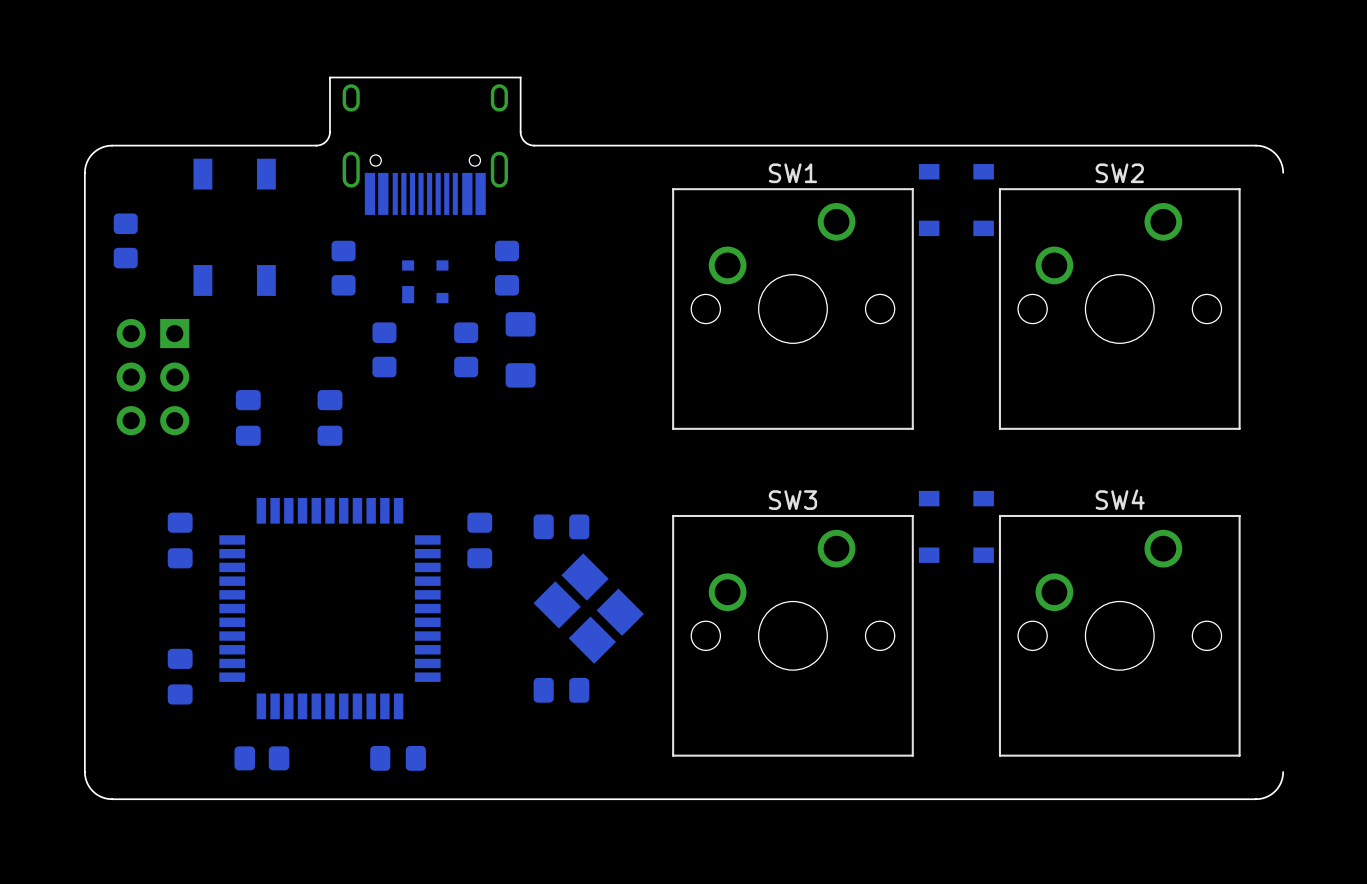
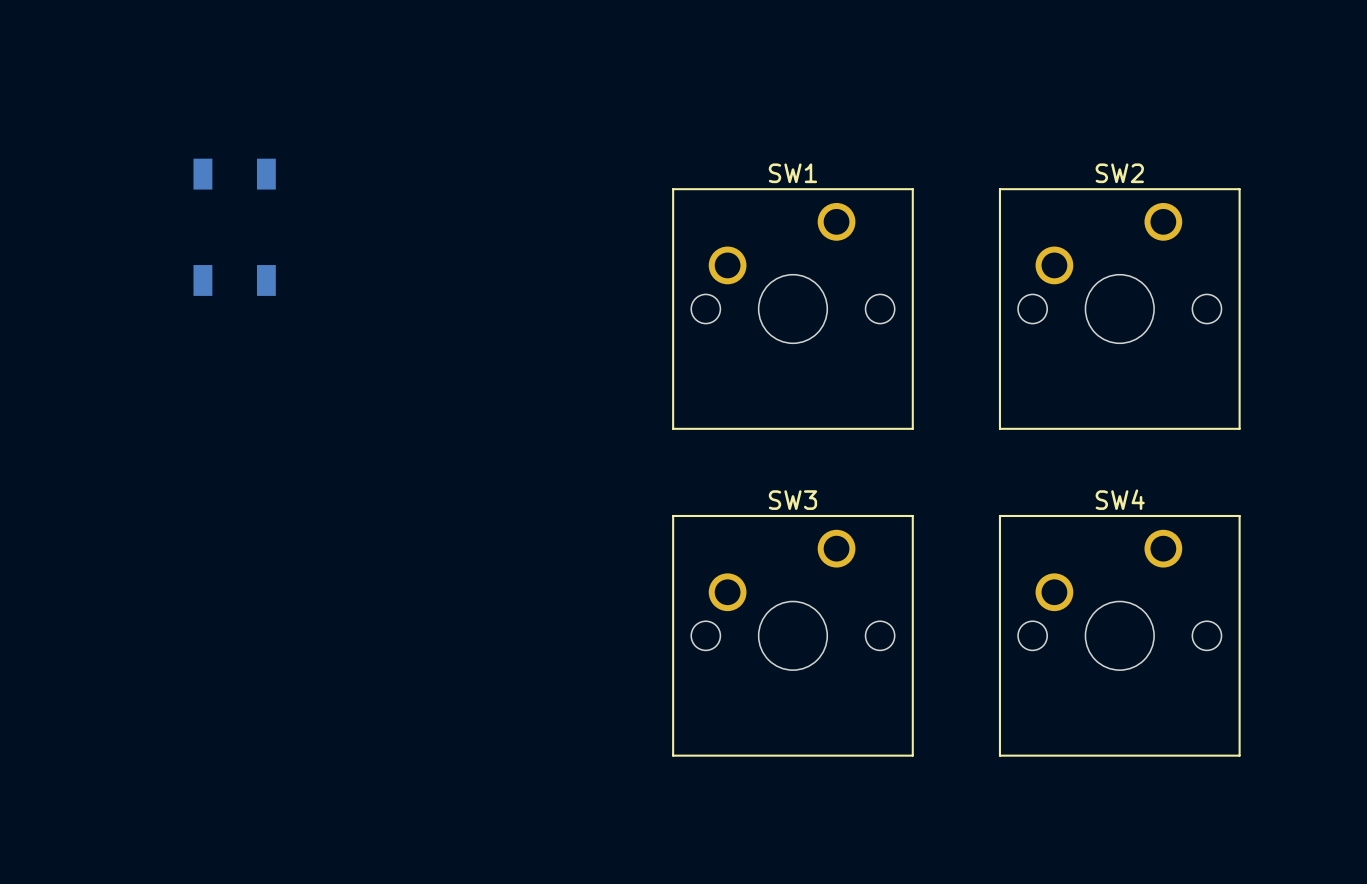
part: (425, 149) -> none
board edge: (1283, 172) (1281, 162) (1275, 153) (1266, 147) (1255, 145) (532, 145) (524, 141) (520, 133) (520, 77) (329, 77) (329, 133) (327, 140) (321, 144) (108, 145) (98, 149) (90, 156) (84, 172) (84, 771) (88, 785) (98, 795) (112, 799) (1255, 799) (1266, 797) (1275, 791) (1281, 782) (1283, 771) -> none
part: (929, 200) -> none
part: (983, 200) -> none
part: (125, 240) -> none
part: (343, 268) -> none
part: (507, 268) -> none
part: (425, 281) -> none
part: (384, 349) -> none
part: (466, 349) -> none
part: (520, 349) -> none
part: (152, 377) -> none
part: (248, 417) -> none
part: (329, 417) -> none
part: (561, 526) -> none
part: (929, 526) -> none
part: (983, 526) -> none
part: (180, 540) -> none
part: (479, 540) -> none
part: (329, 608) -> none
part: (588, 608) -> none
part: (180, 676) -> none
part: (561, 690) -> none
part: (261, 758) -> none
part: (398, 758) -> none

